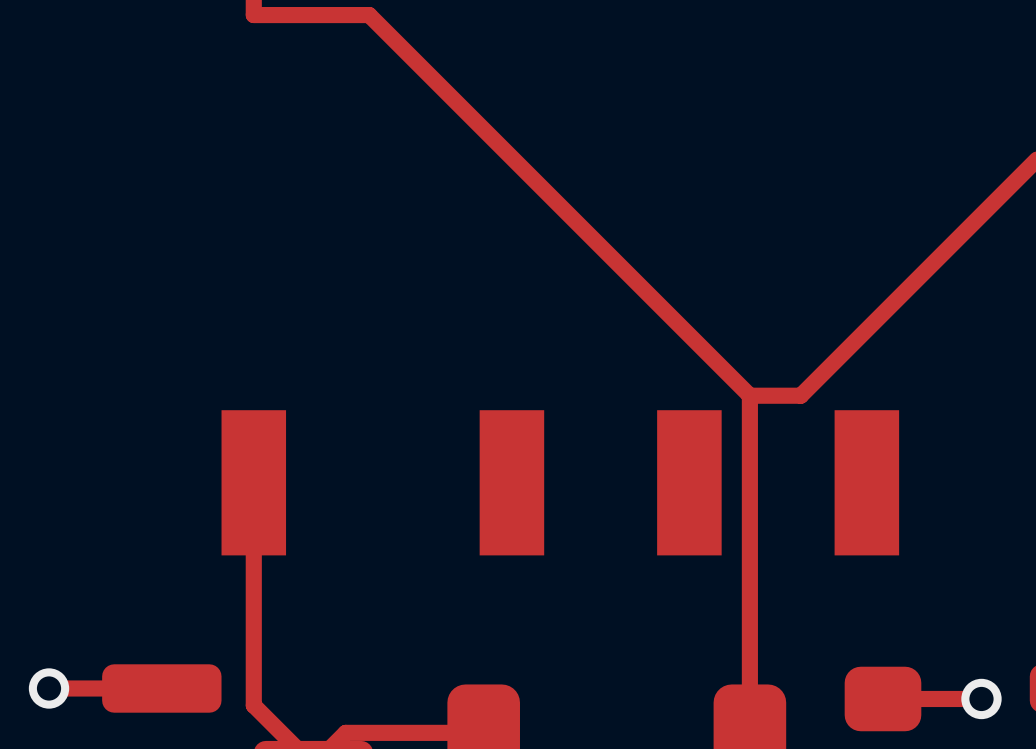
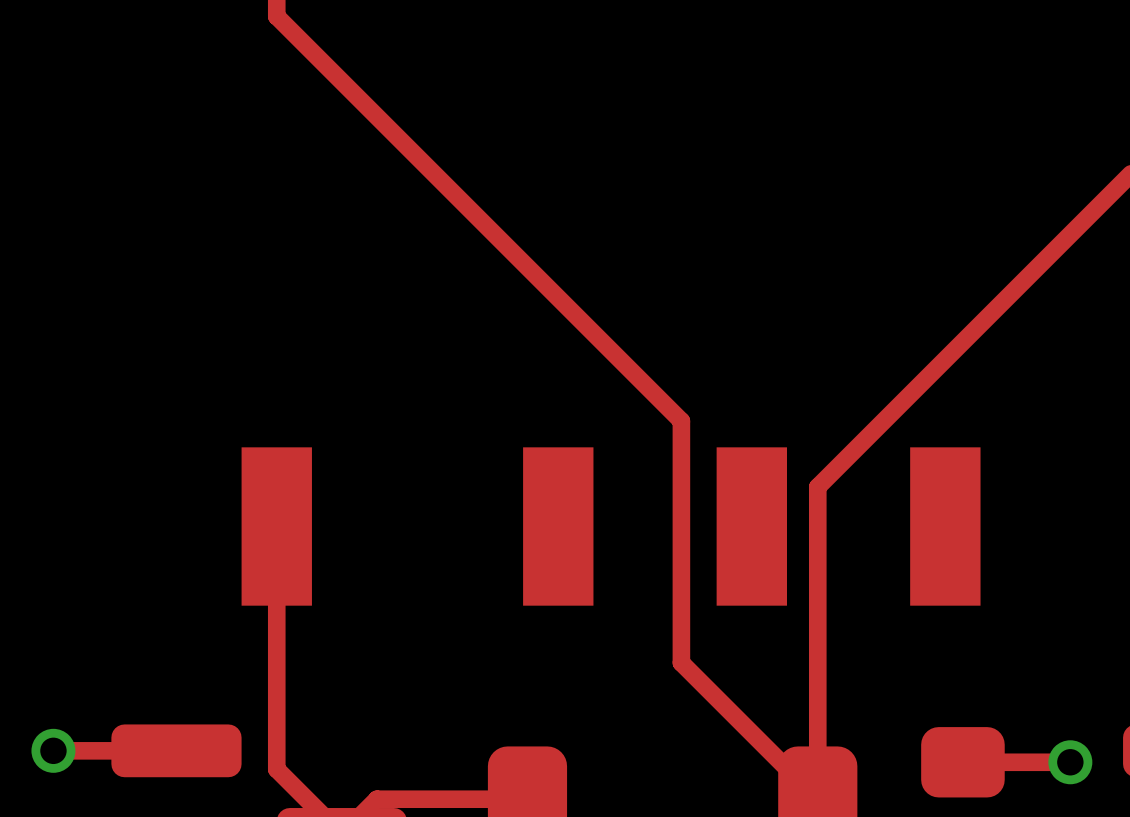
top track: (253, 15) (369, 15) (749, 395) -> (276, 16) (681, 421) (681, 662) (817, 799)
top track: (749, 395) (749, 446) -> none
top track: (800, 395) (749, 395) -> (873, 431) (817, 487)

